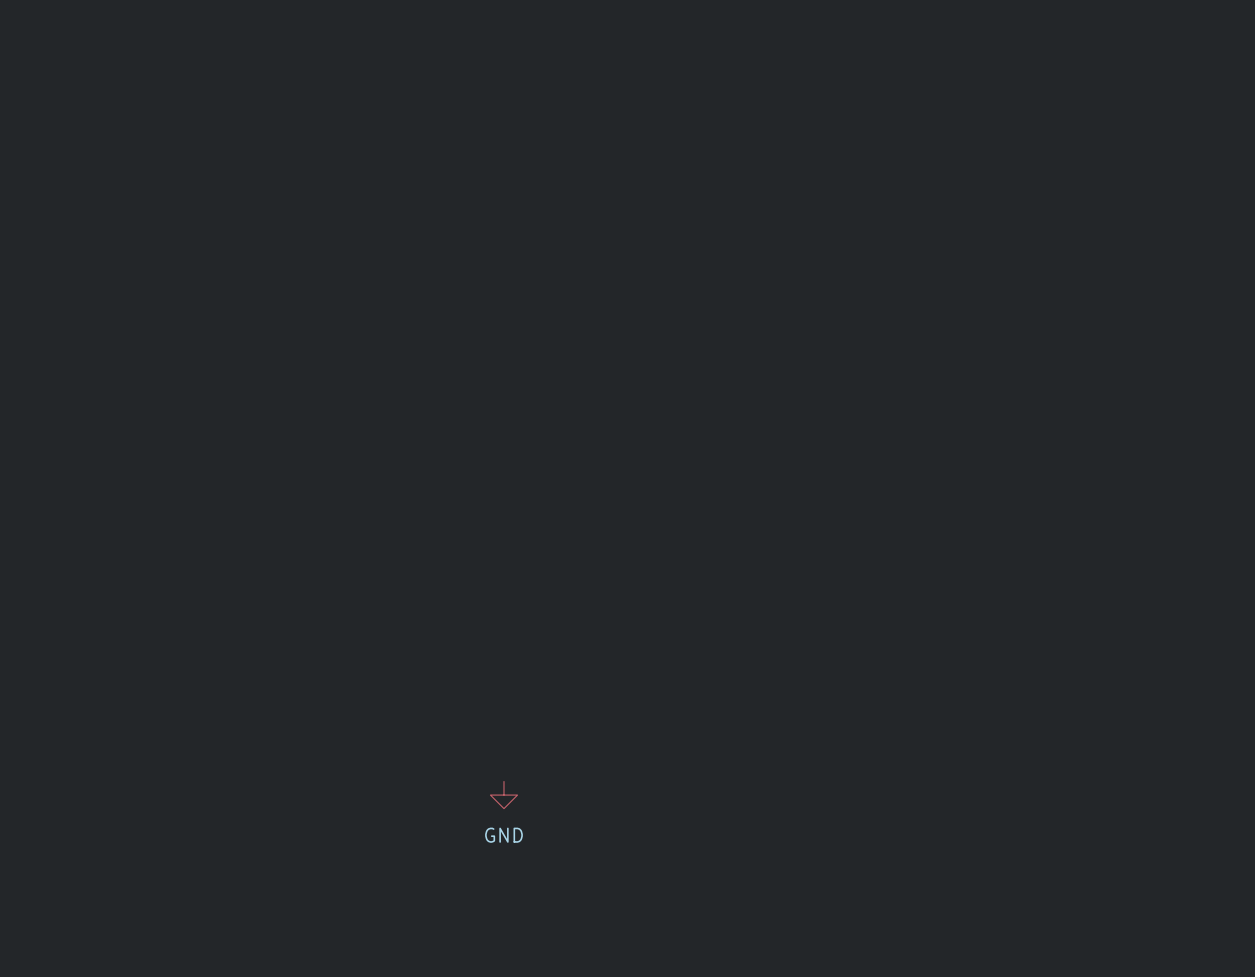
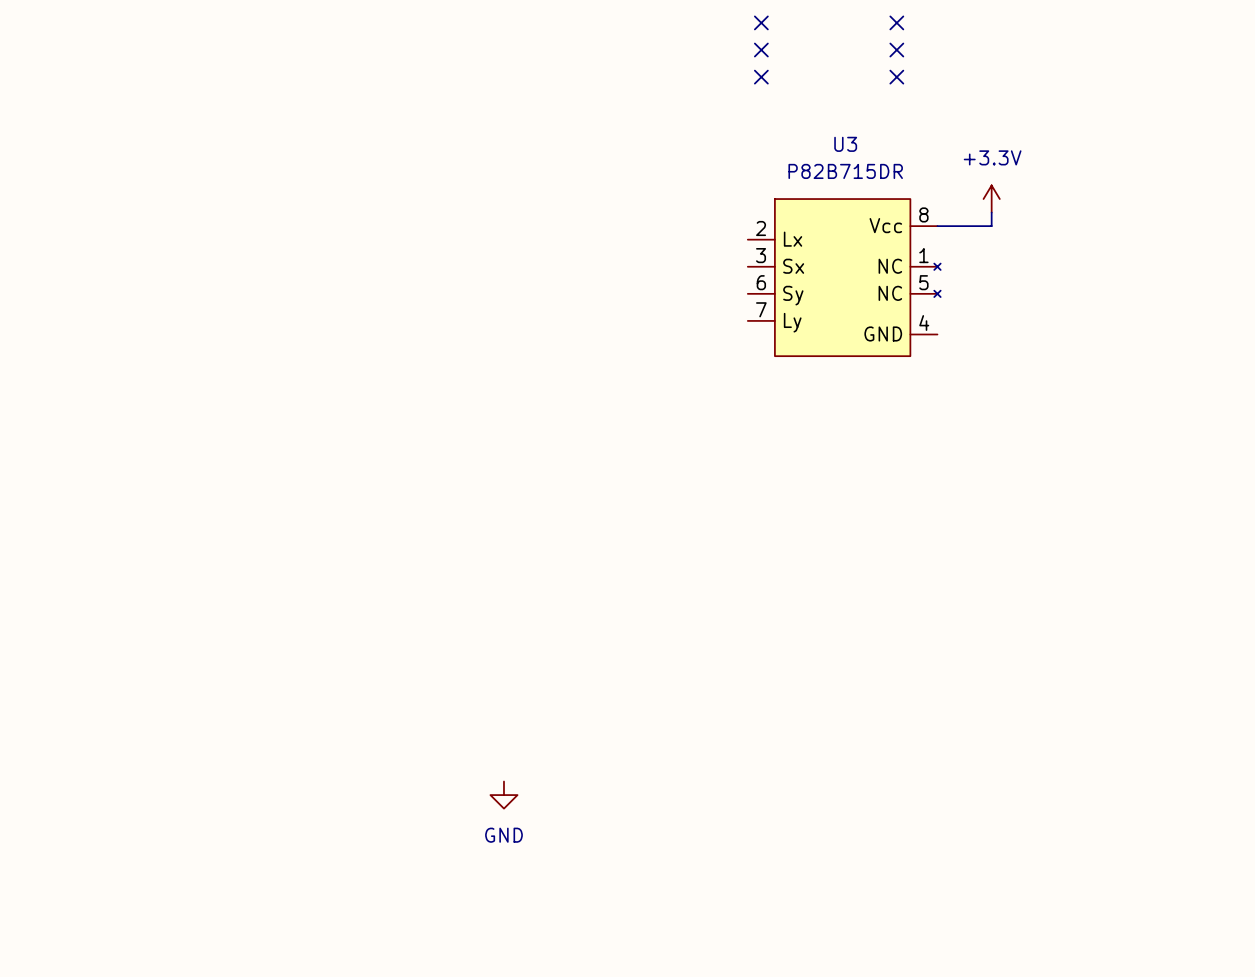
no-connect mark: none -> (761, 22)
no-connect mark: none -> (896, 22)
no-connect mark: none -> (761, 50)
no-connect mark: none -> (896, 50)
no-connect mark: none -> (761, 77)
no-connect mark: none -> (896, 77)
power symbol: none -> +3.3V (991, 199)
wire: none -> (991, 212) (991, 226) (937, 226)
U3: none -> P82B715DR (844, 277)

